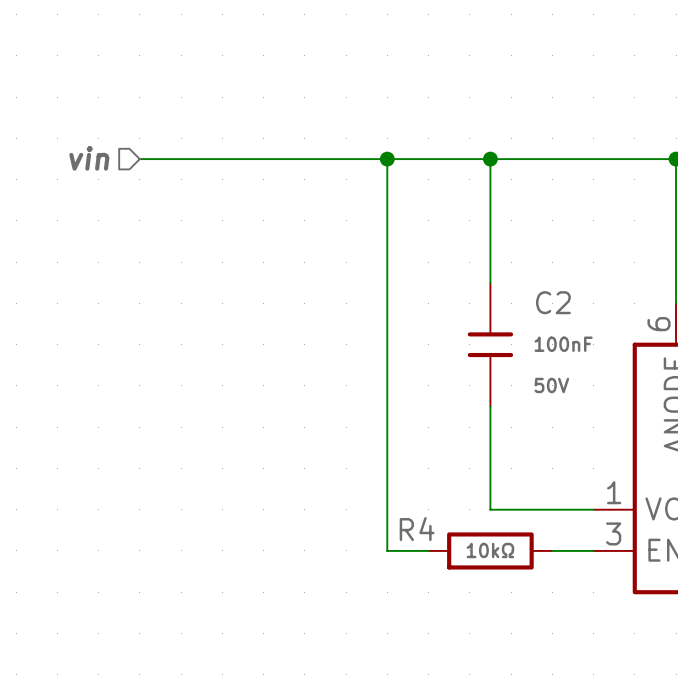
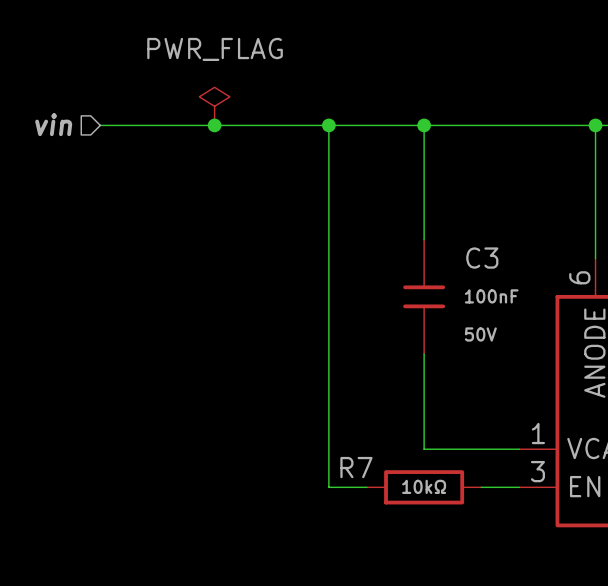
power symbol: none -> PWR_FLAG (214, 106)
junction: none -> (214, 125)
C2 name: C2 (553, 302) -> C3 (482, 258)
R4 name: R4 (417, 529) -> R7 (356, 467)

